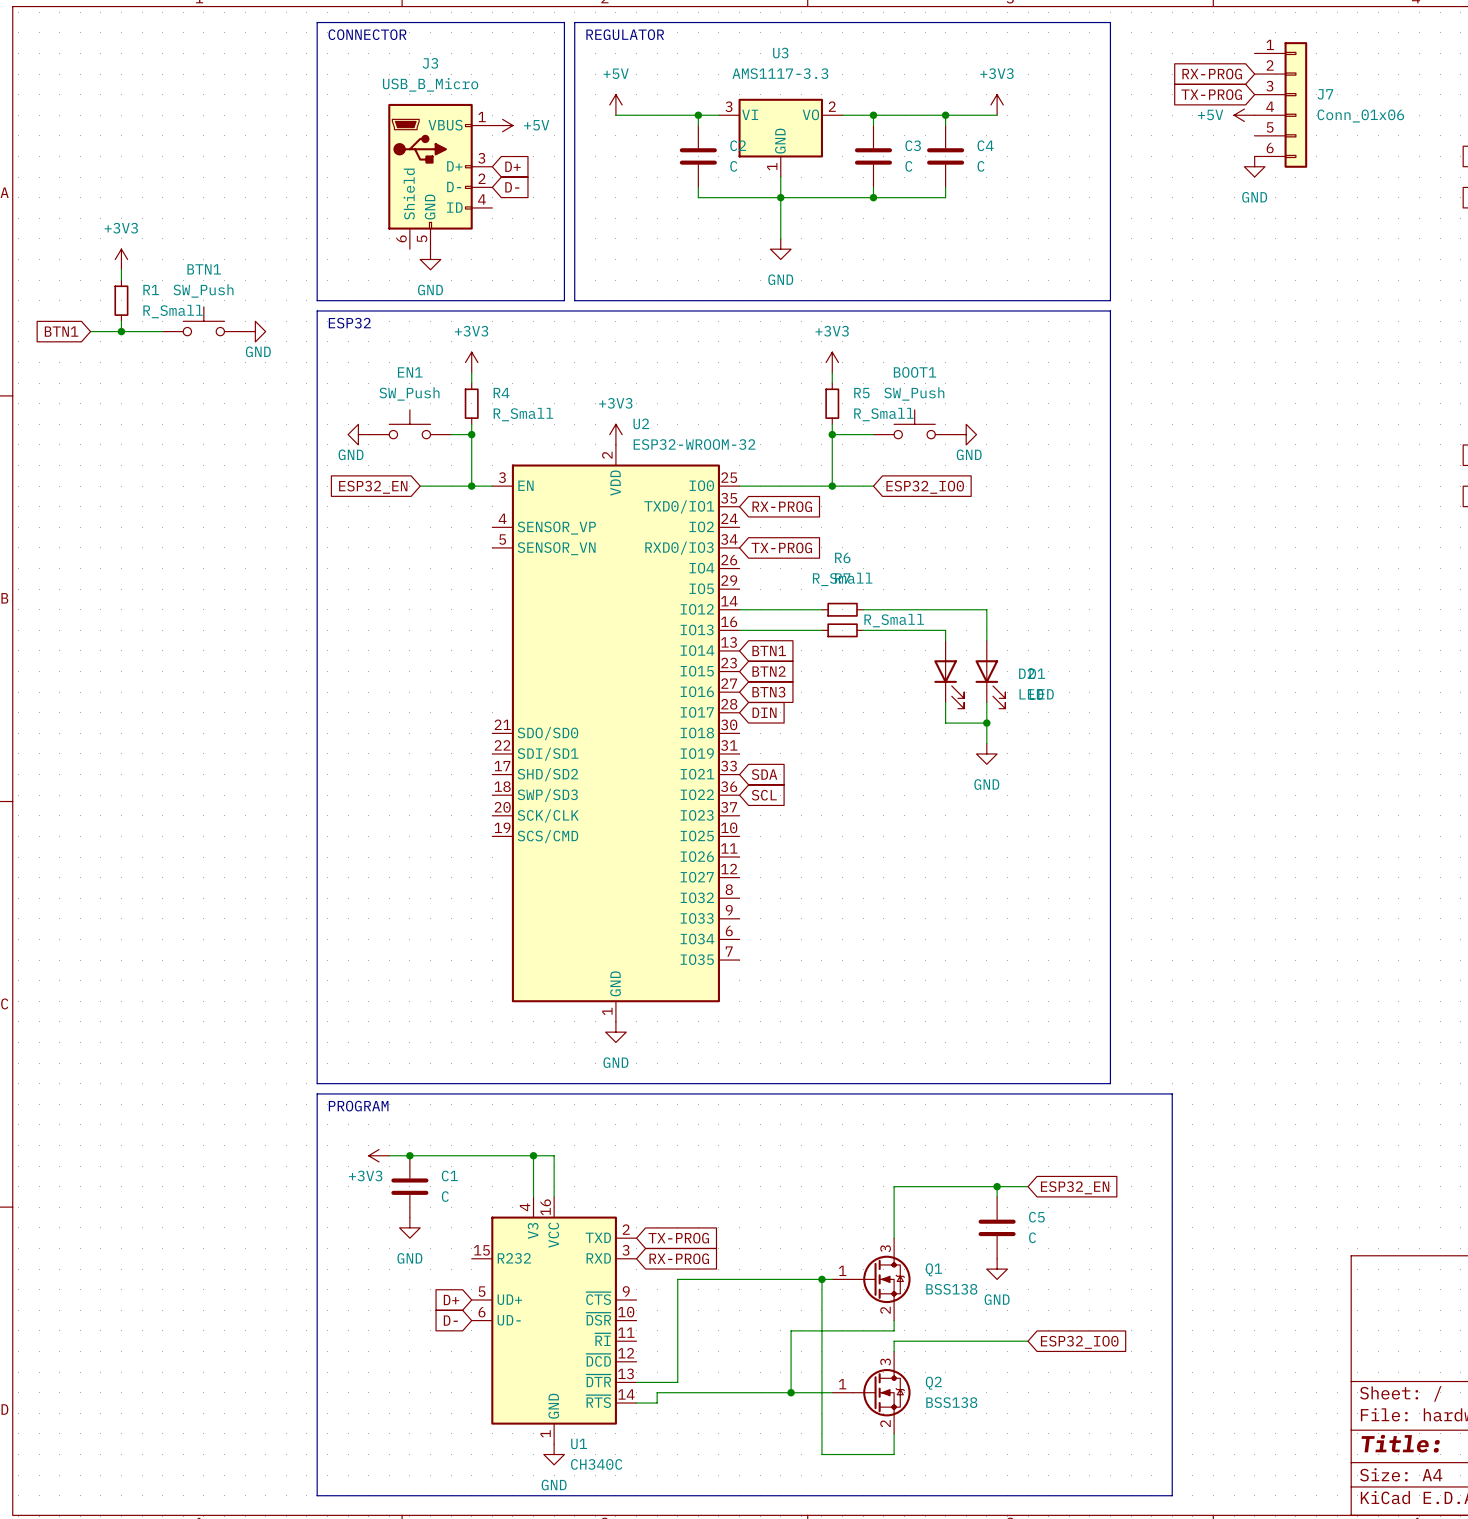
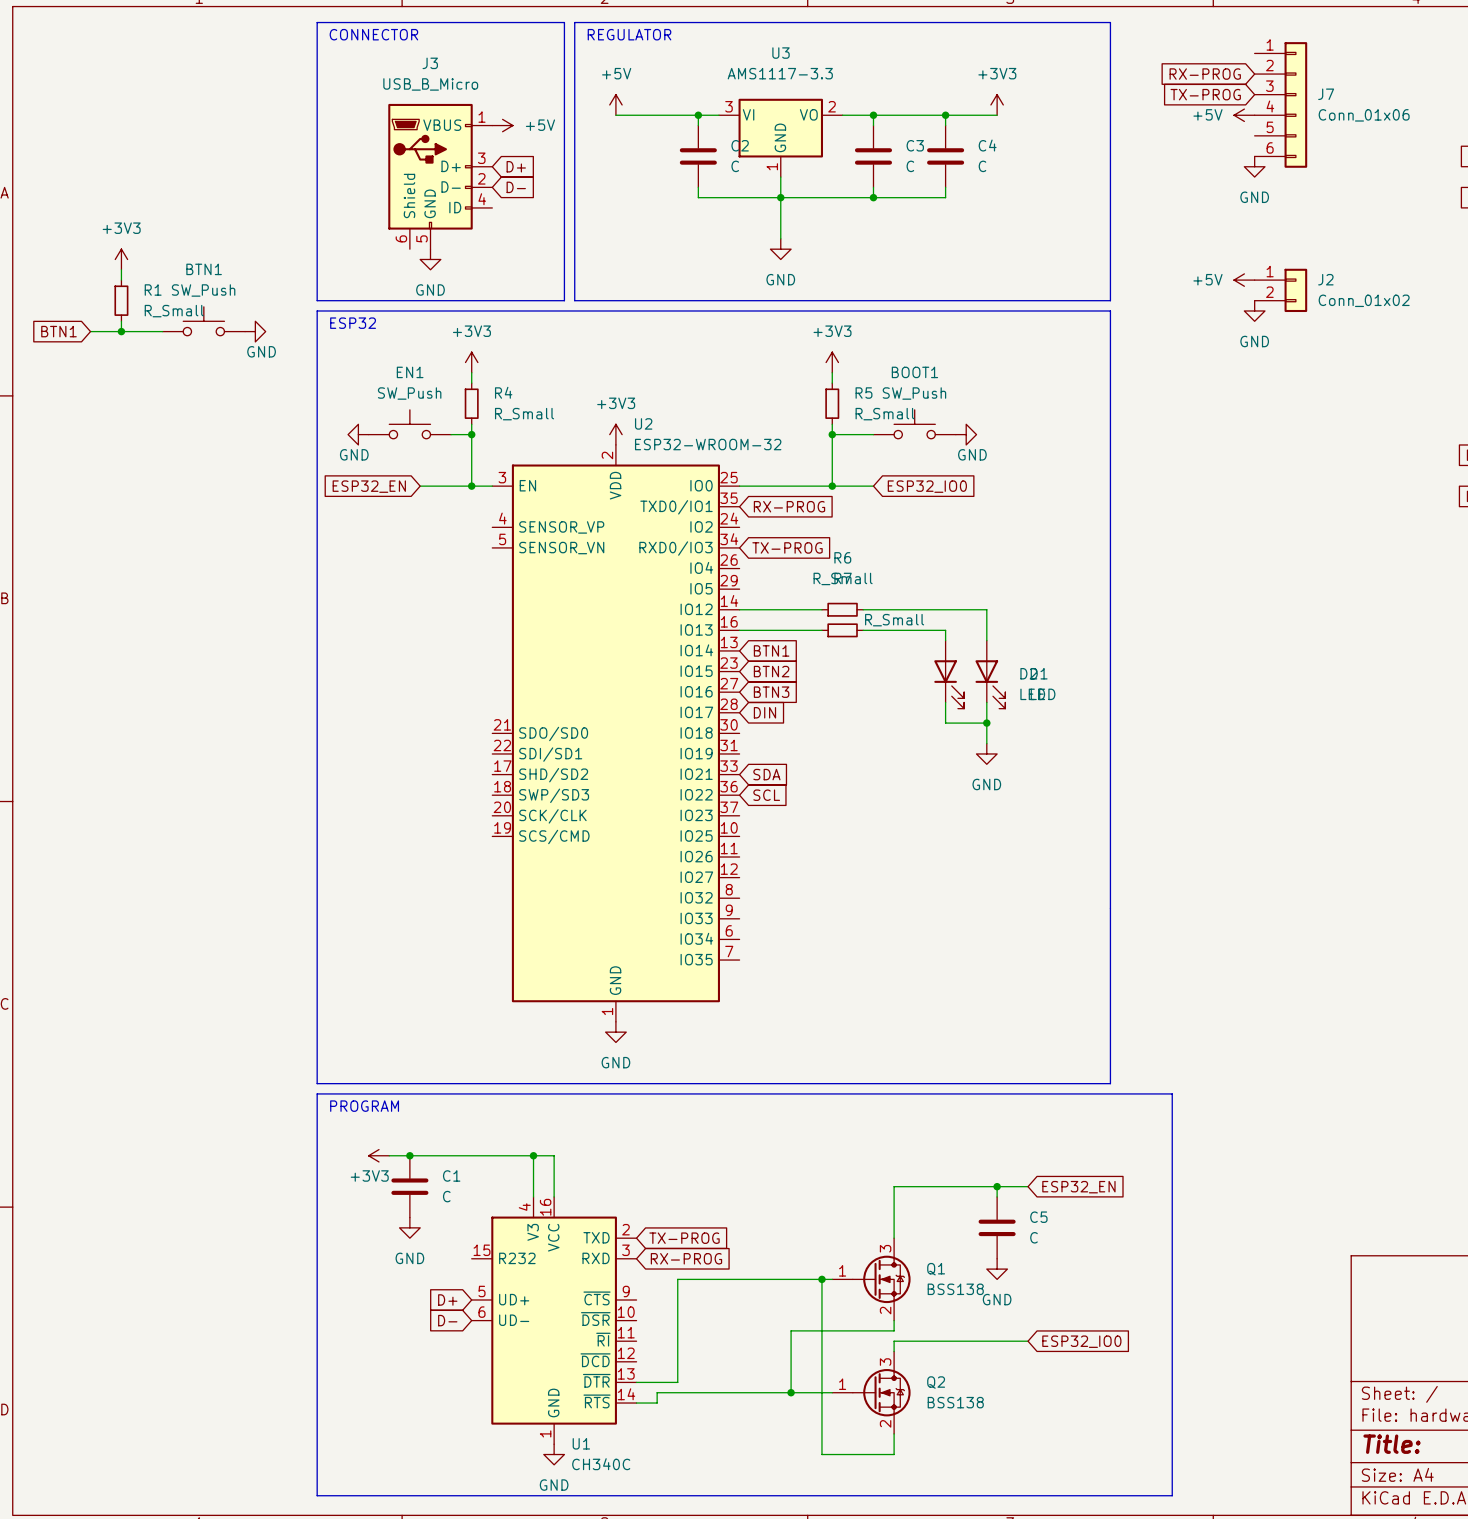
power symbol: none -> +5V (1244, 280)
J2: none -> Conn_01x02 (1280, 290)
power symbol: none -> GND (1254, 310)

